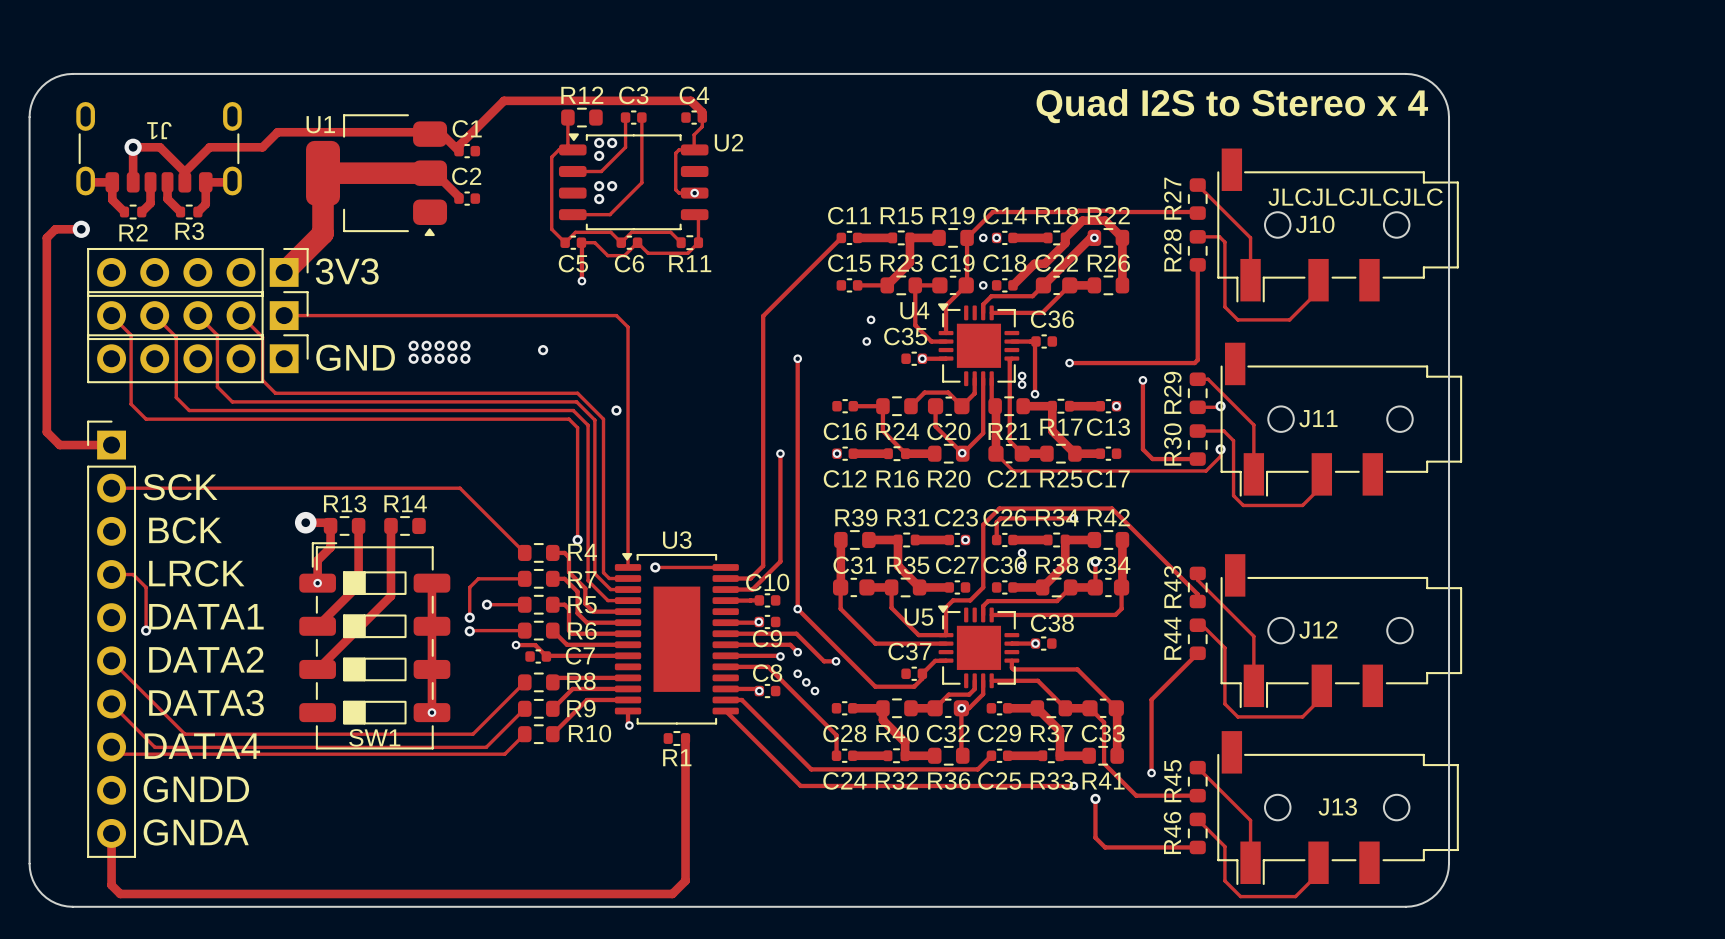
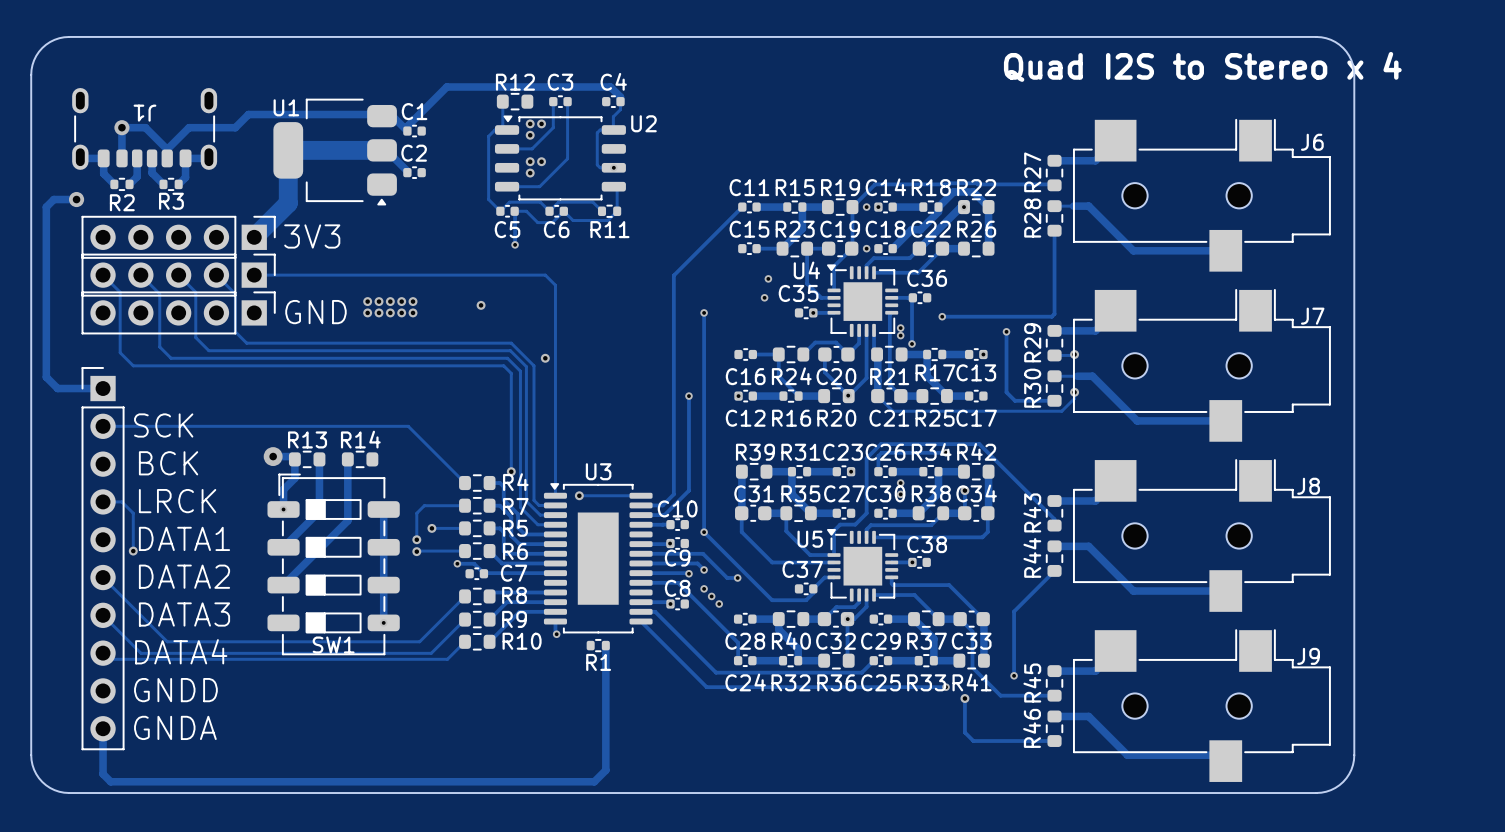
text position: Quad I2S to Stereo x 4 (1232, 106) -> Quad I2S to Stereo x 4 (1202, 66)
board edge: (29, 117) (32, 100) (42, 86) (56, 77) (72, 73) (1405, 73) (1427, 79) (1443, 95) (1449, 117) (1449, 863) (1445, 880) (1436, 894) (1422, 903) (1405, 906) -> (31, 101) (31, 69) (36, 55) (50, 42) (69, 36) (1316, 36) (1335, 42) (1349, 55) (1354, 74) (1353, 760) (1346, 778) (1335, 787) (1326, 791) (1236, 793)
track: (1197, 185) (1250, 237) (1250, 280) -> (1054, 160) (1095, 160) (1115, 140)
text: JLCJLCJLCJLC (1355, 197) -> none
J6: none -> (1201, 195)
J10: (1338, 225) -> none
track: (1219, 236) (1224, 242) (1224, 306) (1237, 319) (1289, 319) (1318, 291) (1318, 280) -> (1073, 206) (1088, 206) (1133, 250) (1225, 250)
track: (1208, 379) (1253, 425) (1253, 474) -> (1063, 330) (1095, 330) (1115, 310)
J7: none -> (1201, 365)
J11: (1341, 419) -> none
track: (1223, 431) (1233, 440) (1233, 495) (1243, 505) (1302, 505) (1321, 486) (1321, 474) -> (1077, 376) (1092, 376) (1137, 420) (1225, 420)
track: (1197, 573) (1197, 580) (1253, 636) (1253, 685) -> (1054, 500) (1095, 500) (1115, 480)
J8: none -> (1201, 535)
track: (1202, 625) (1224, 647) (1224, 703) (1237, 716) (1302, 716) (1321, 697) (1321, 685) -> (1058, 546) (1088, 546) (1133, 591) (1225, 591)
J12: (1341, 631) -> none
track: (1197, 767) (1250, 820) (1250, 862) -> (1054, 671) (1095, 671) (1115, 651)
J9: none -> (1201, 705)
J13: (1338, 808) -> none
track: (1197, 819) (1224, 846) (1224, 880) (1240, 896) (1295, 896) (1318, 873) (1318, 862) -> (1054, 716) (1088, 716) (1127, 755) (1219, 755) (1225, 761)

